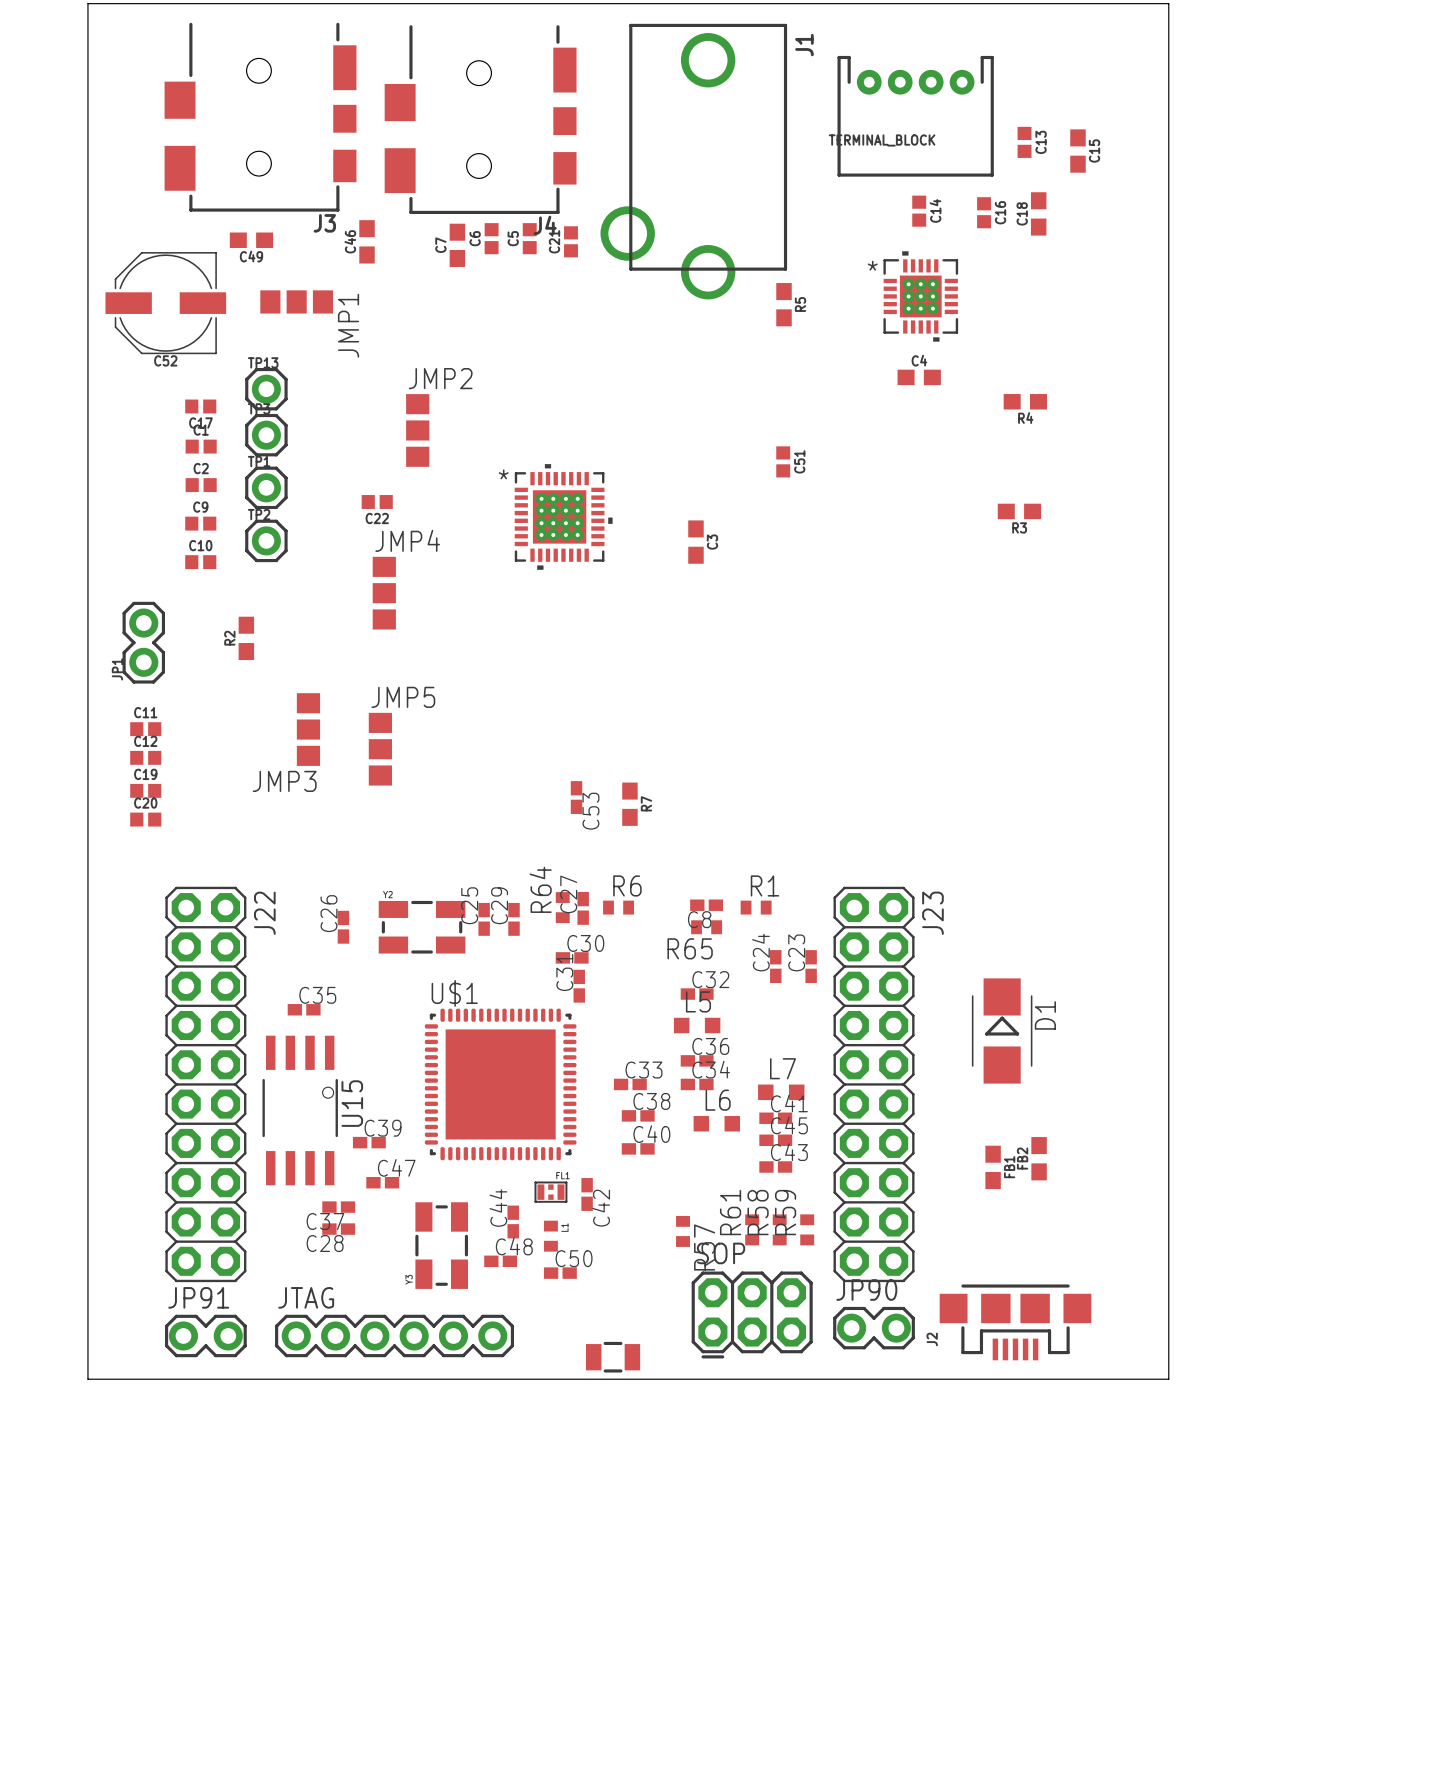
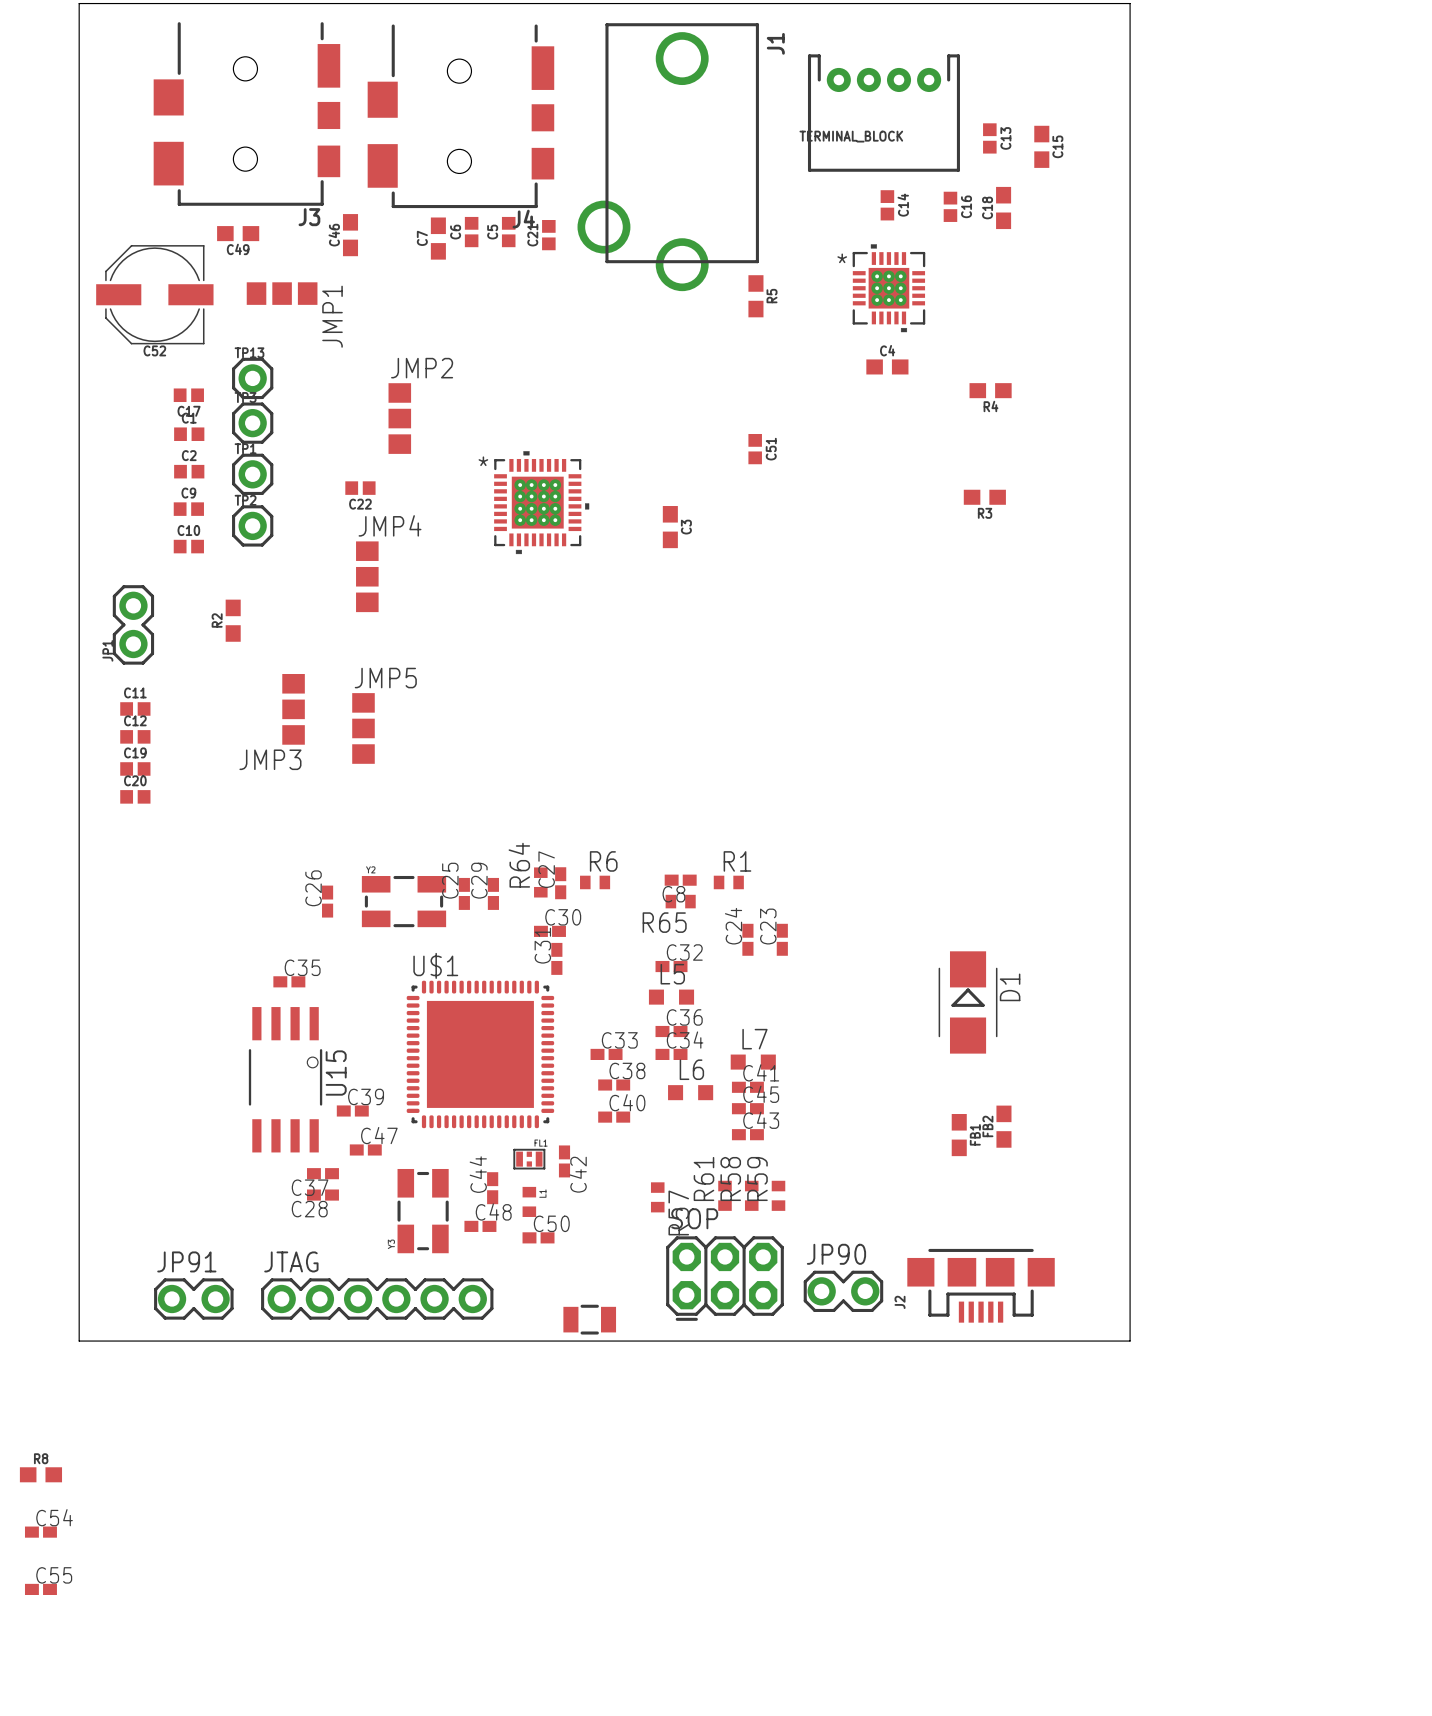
C53: (576, 797) -> none
R7: (629, 804) -> none
J22: (205, 1084) -> none
J23: (874, 1084) -> none
R8: none -> (40, 1474)
C54: none -> (40, 1532)
C55: none -> (40, 1589)

